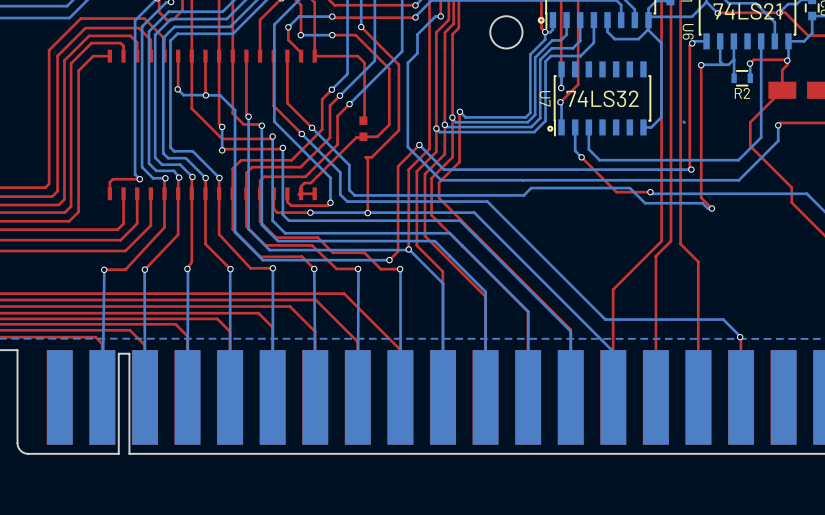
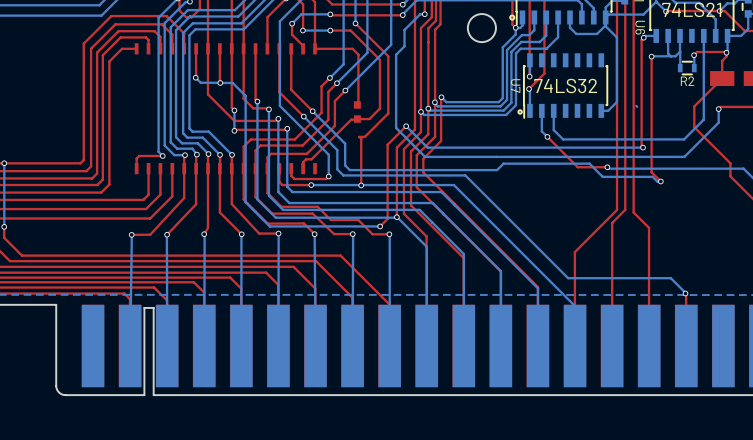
top track: (314, 193) (298, 194) -> none

